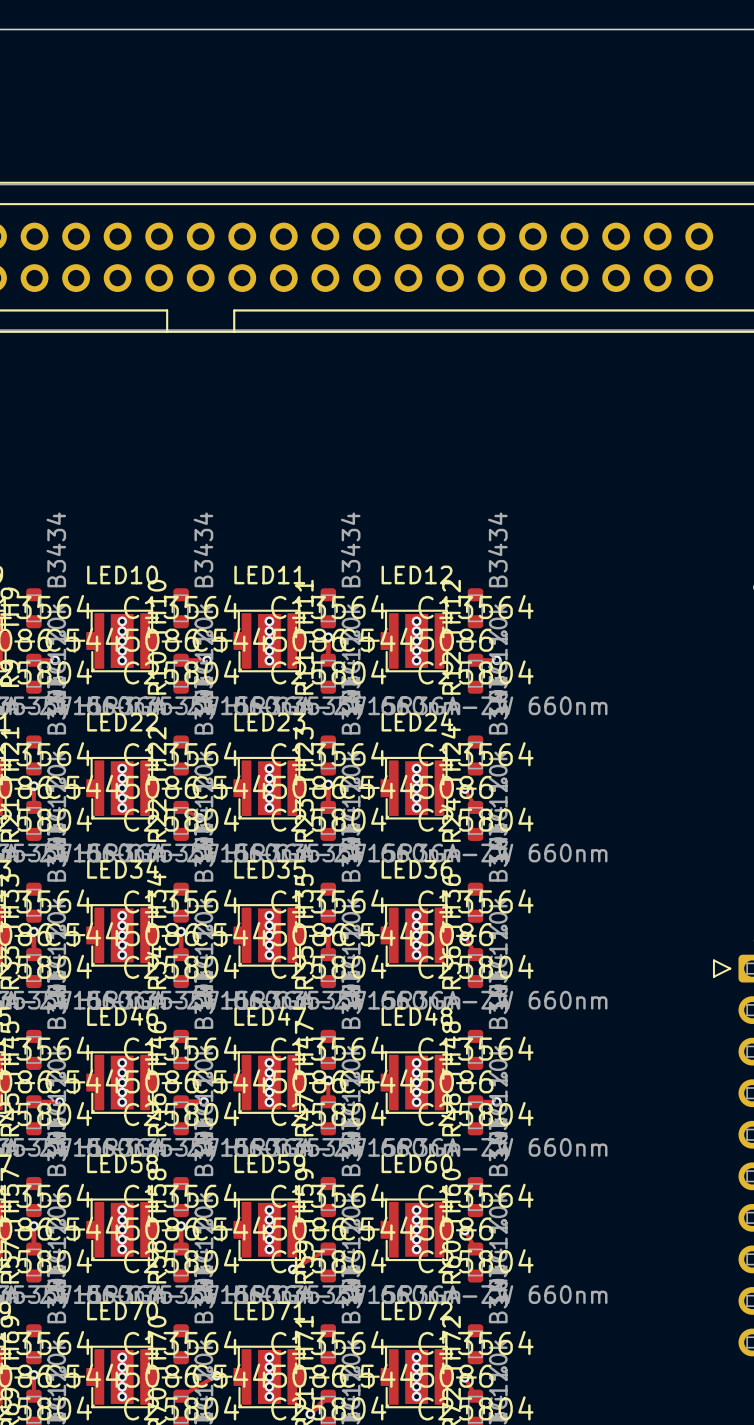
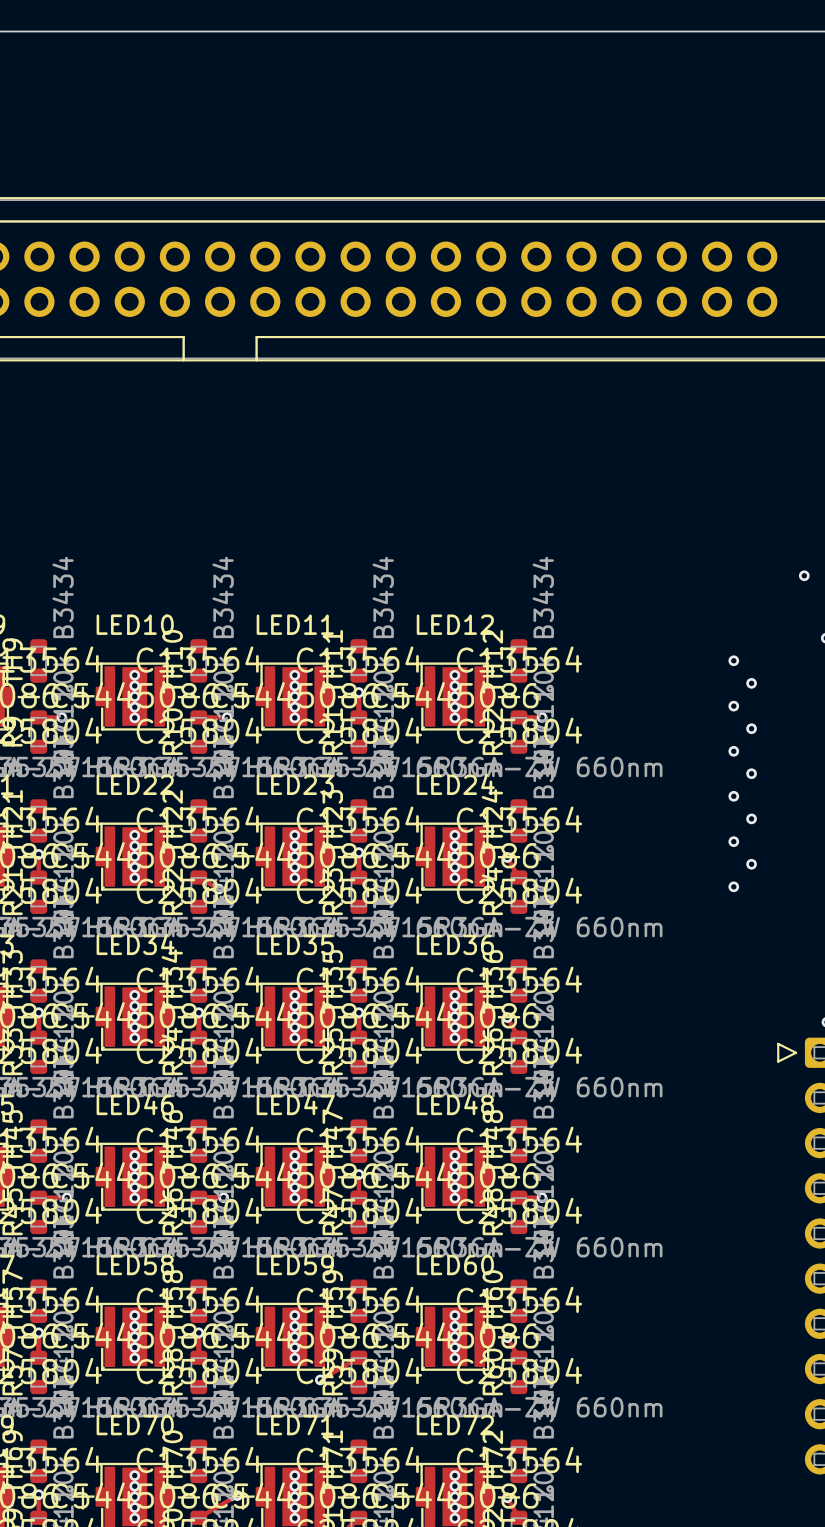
via: none -> (804, 575)
via: none -> (733, 660)
via: none -> (751, 683)
via: none -> (733, 706)
via: none -> (751, 728)
via: none -> (733, 751)
via: none -> (751, 773)
via: none -> (733, 796)
via: none -> (751, 818)
via: none -> (733, 841)
via: none -> (751, 864)
via: none -> (733, 886)

